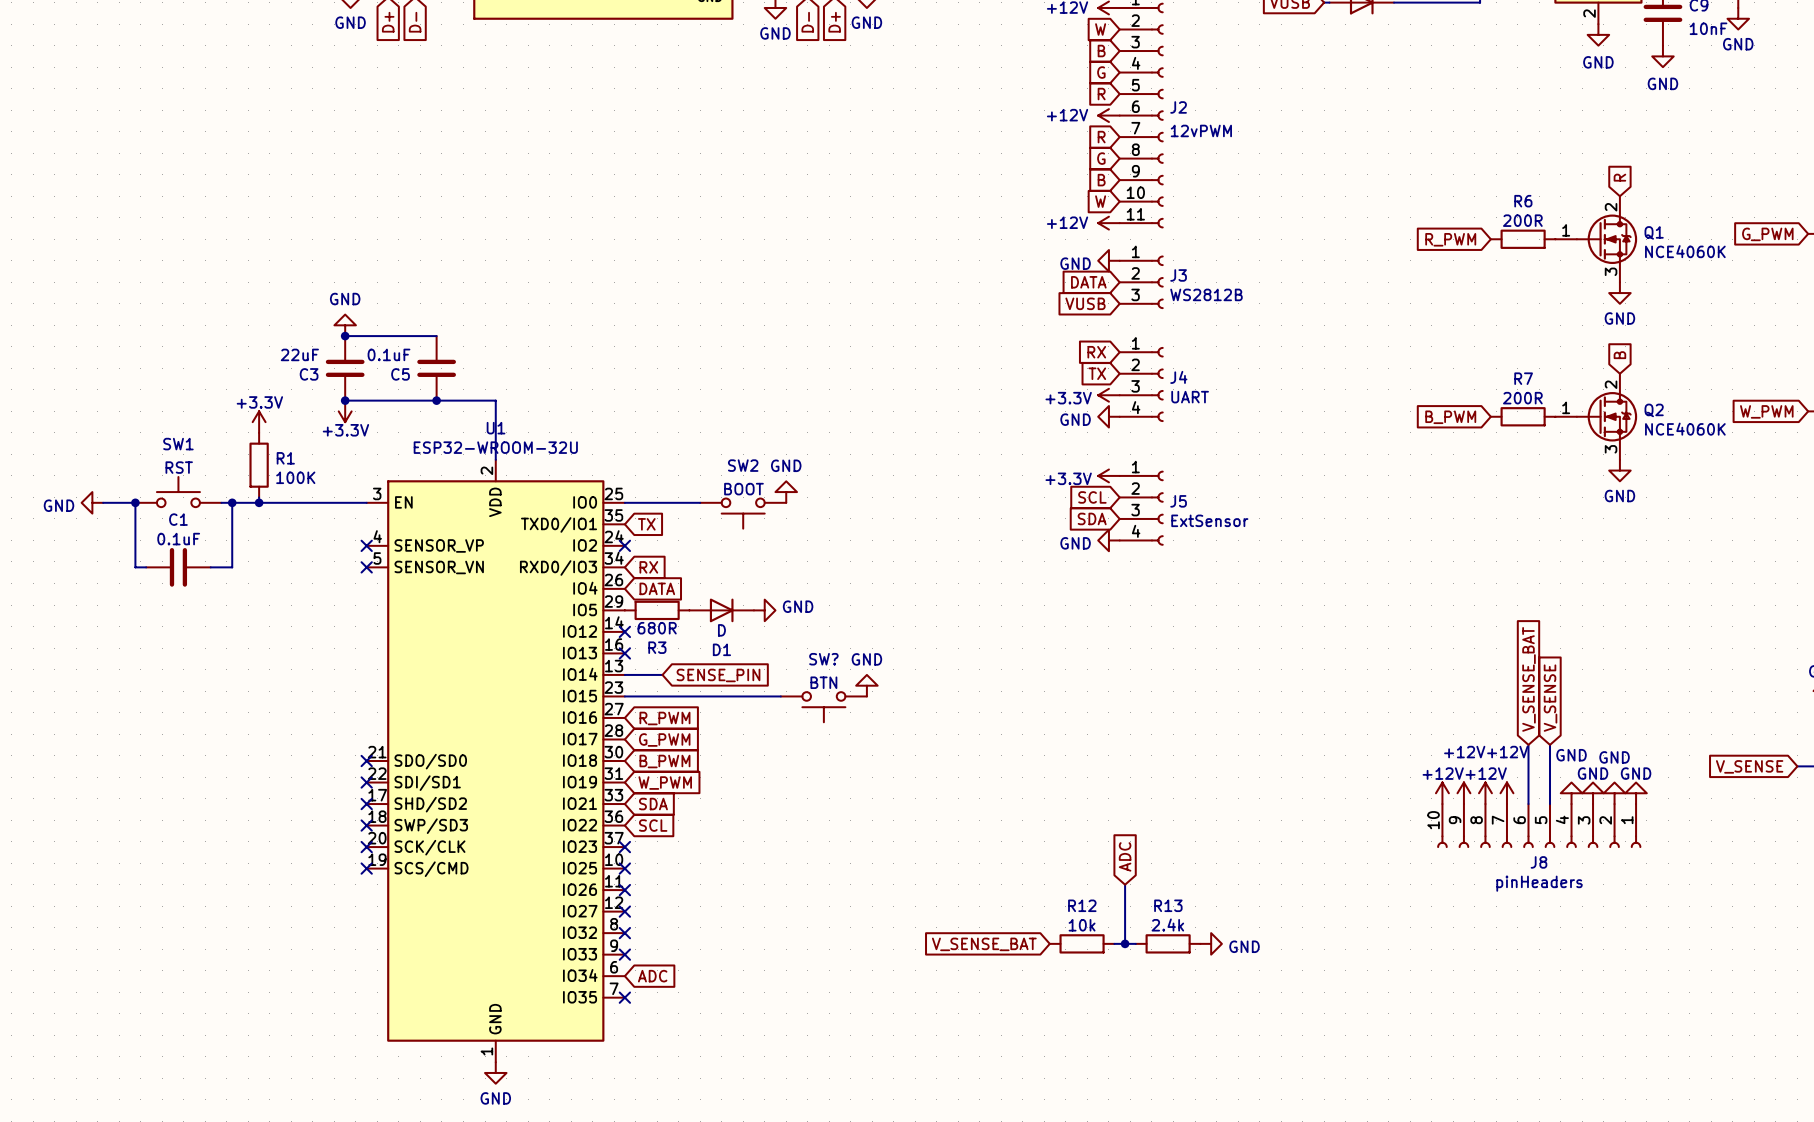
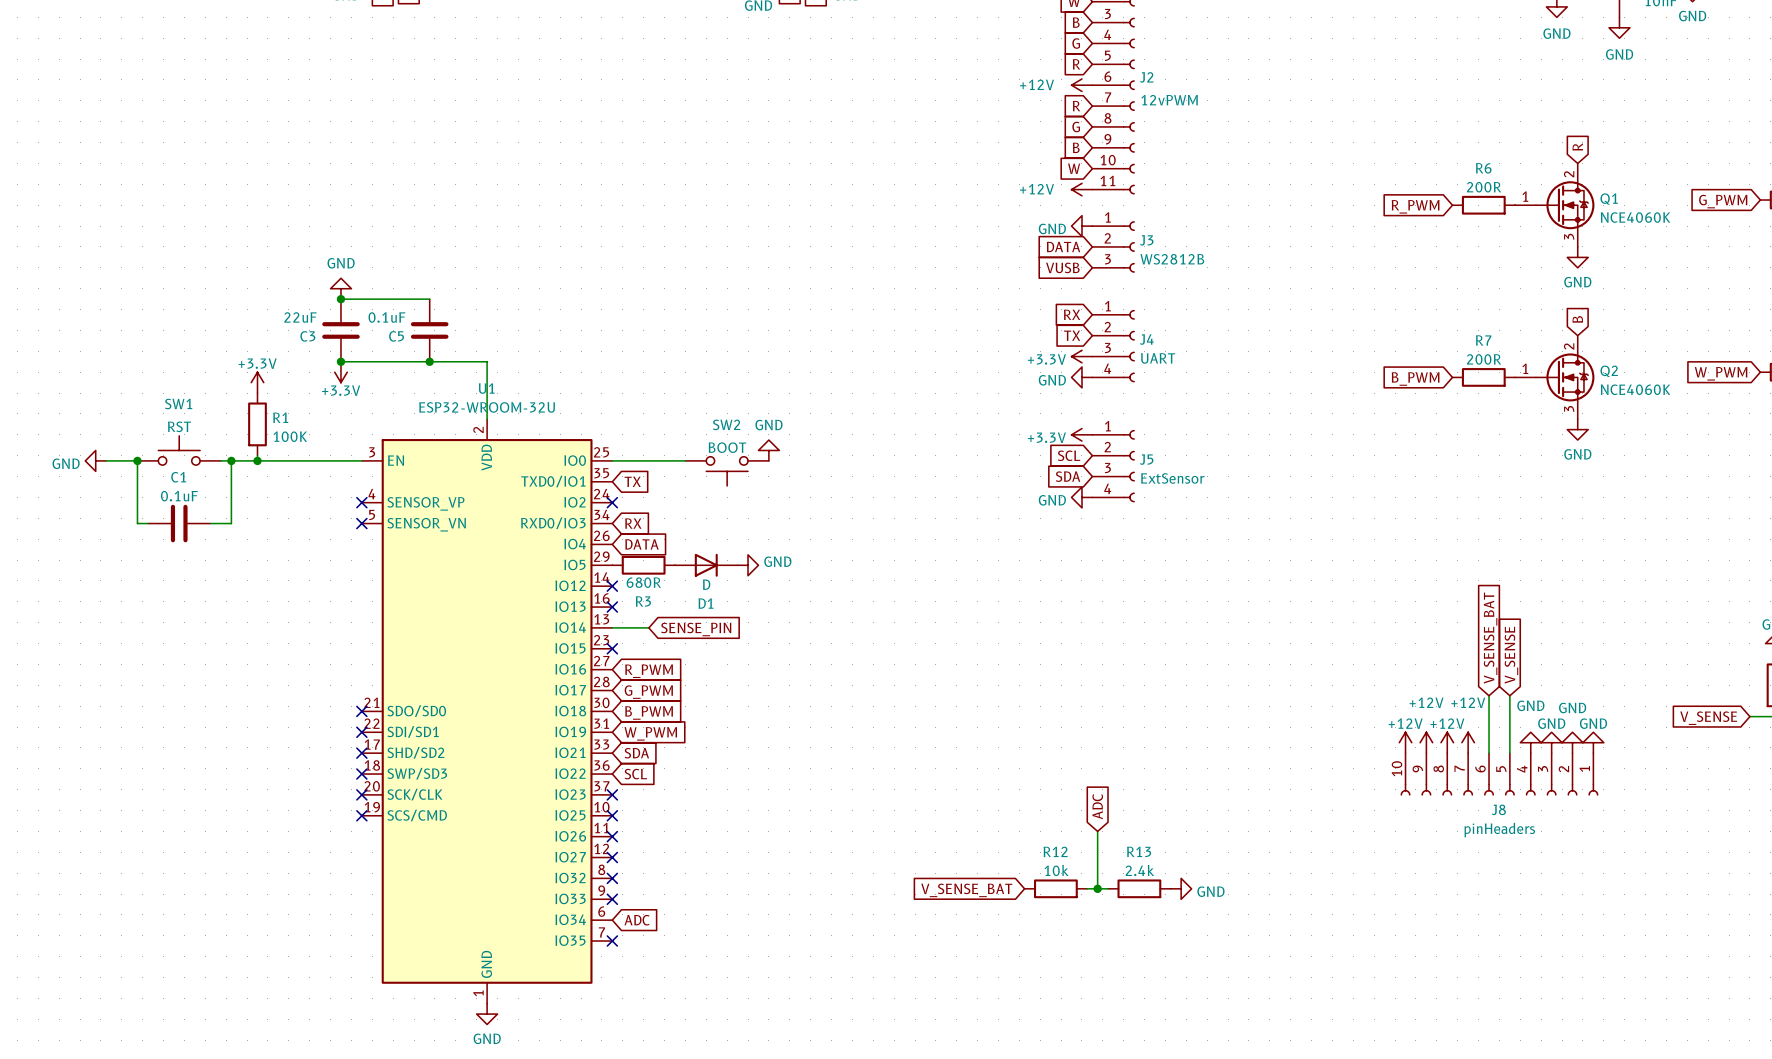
power symbol: GND (866, 685) -> none
wire: (624, 696) (780, 696) -> none
no-connect mark: none -> (612, 648)
SW?: BTN (823, 707) -> none

